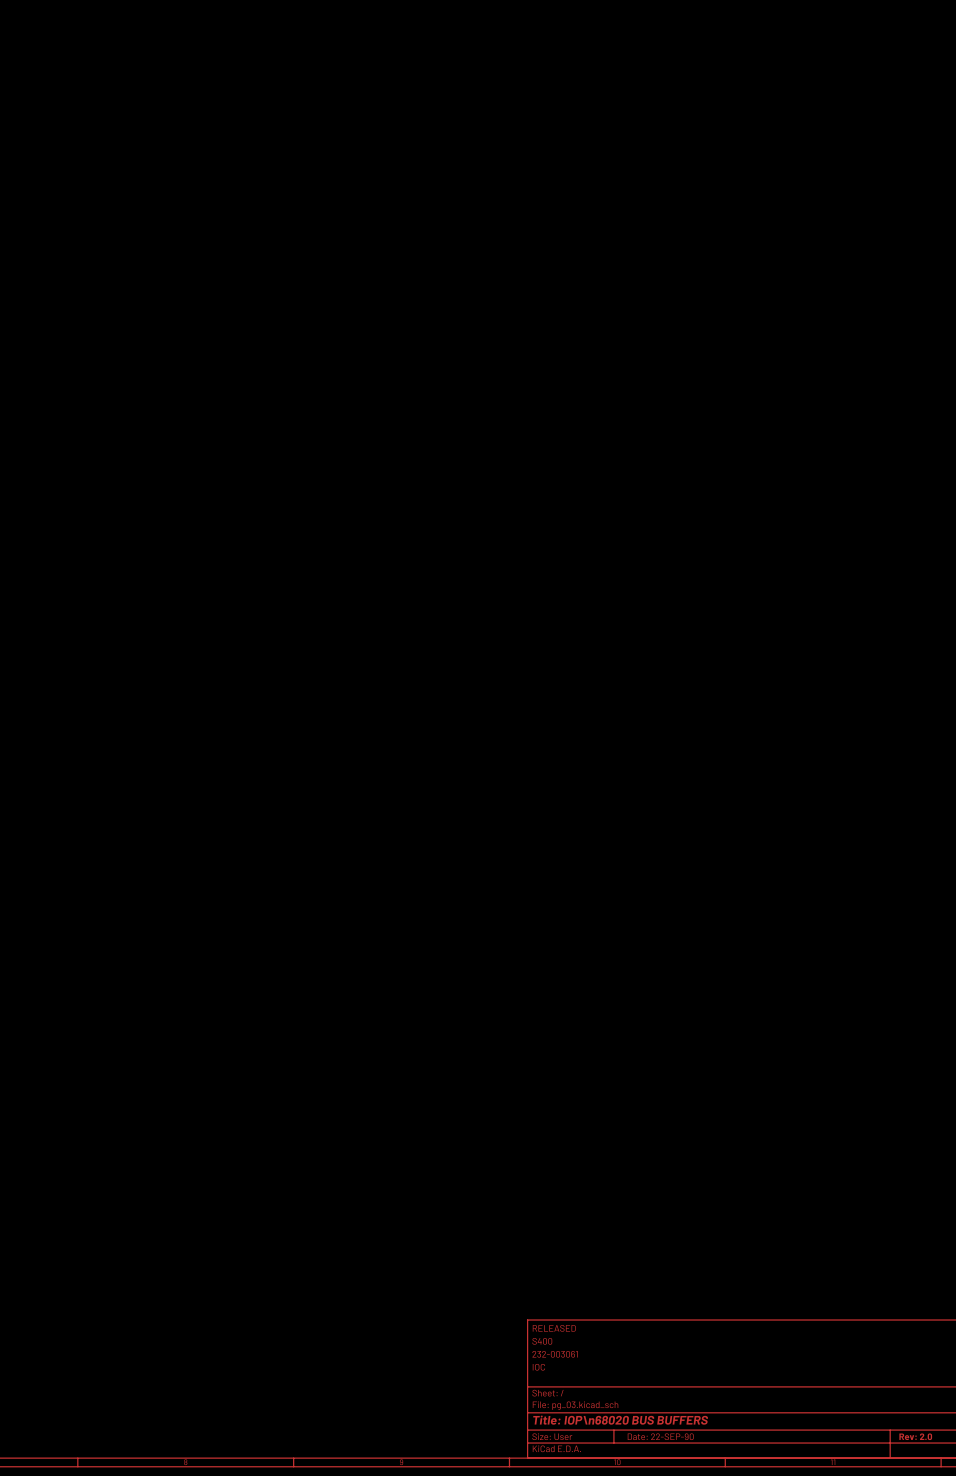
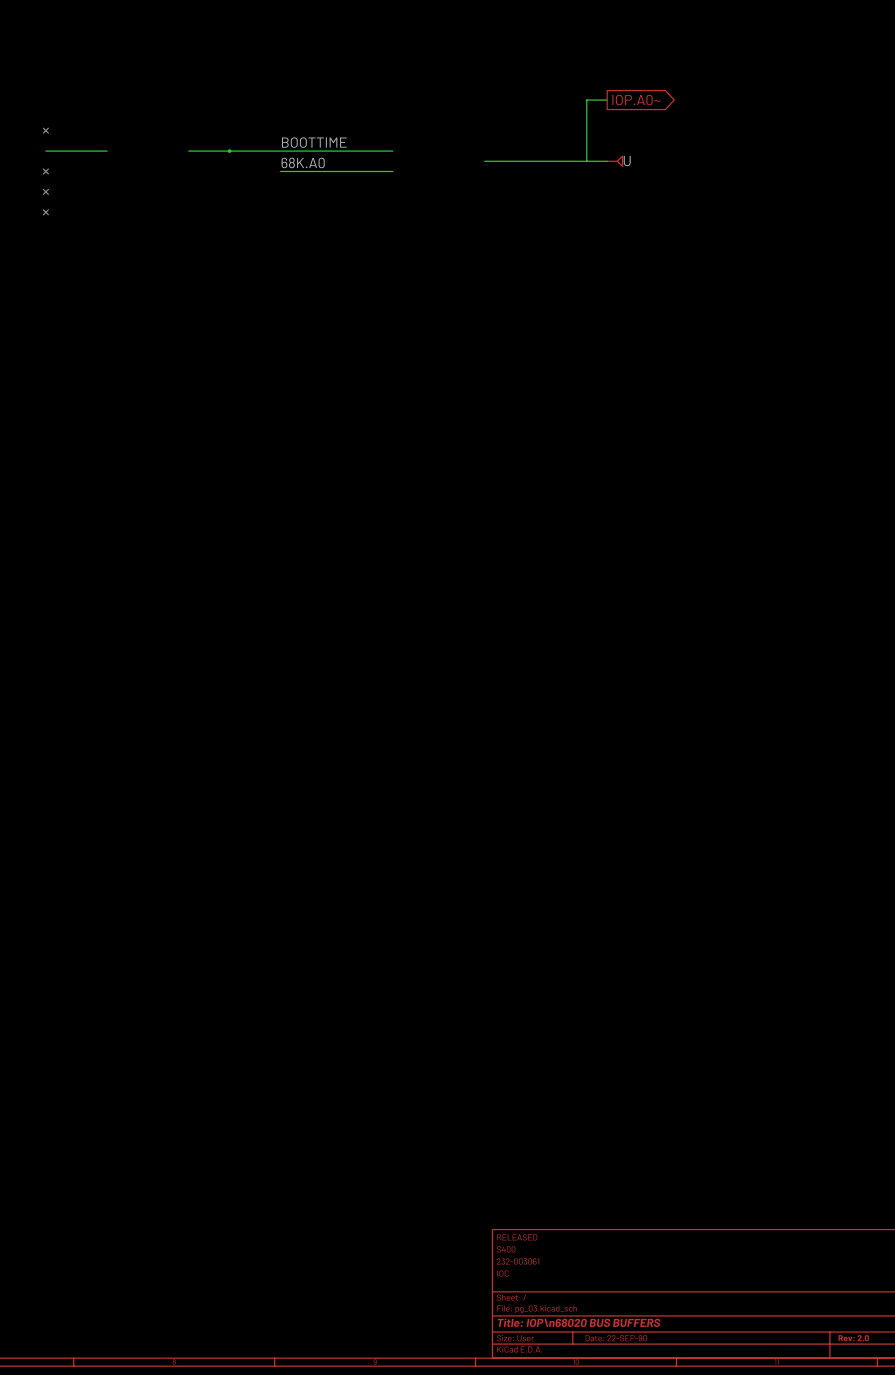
wire: none -> (607, 100) (586, 100) (586, 161)
global label: none -> IOP.A0~ (636, 100)
no-connect mark: none -> (45, 130)
label: none -> BOOTTIME (314, 142)
wire: none -> (45, 151) (107, 151)
wire: none -> (188, 151) (392, 151)
junction: none -> (229, 151)
wire: none -> (484, 161) (607, 161)
U: none -> (614, 161)
label: none -> 68K.A0 (303, 162)
no-connect mark: none -> (45, 171)
wire: none -> (280, 171) (392, 171)
no-connect mark: none -> (45, 191)
no-connect mark: none -> (45, 212)

